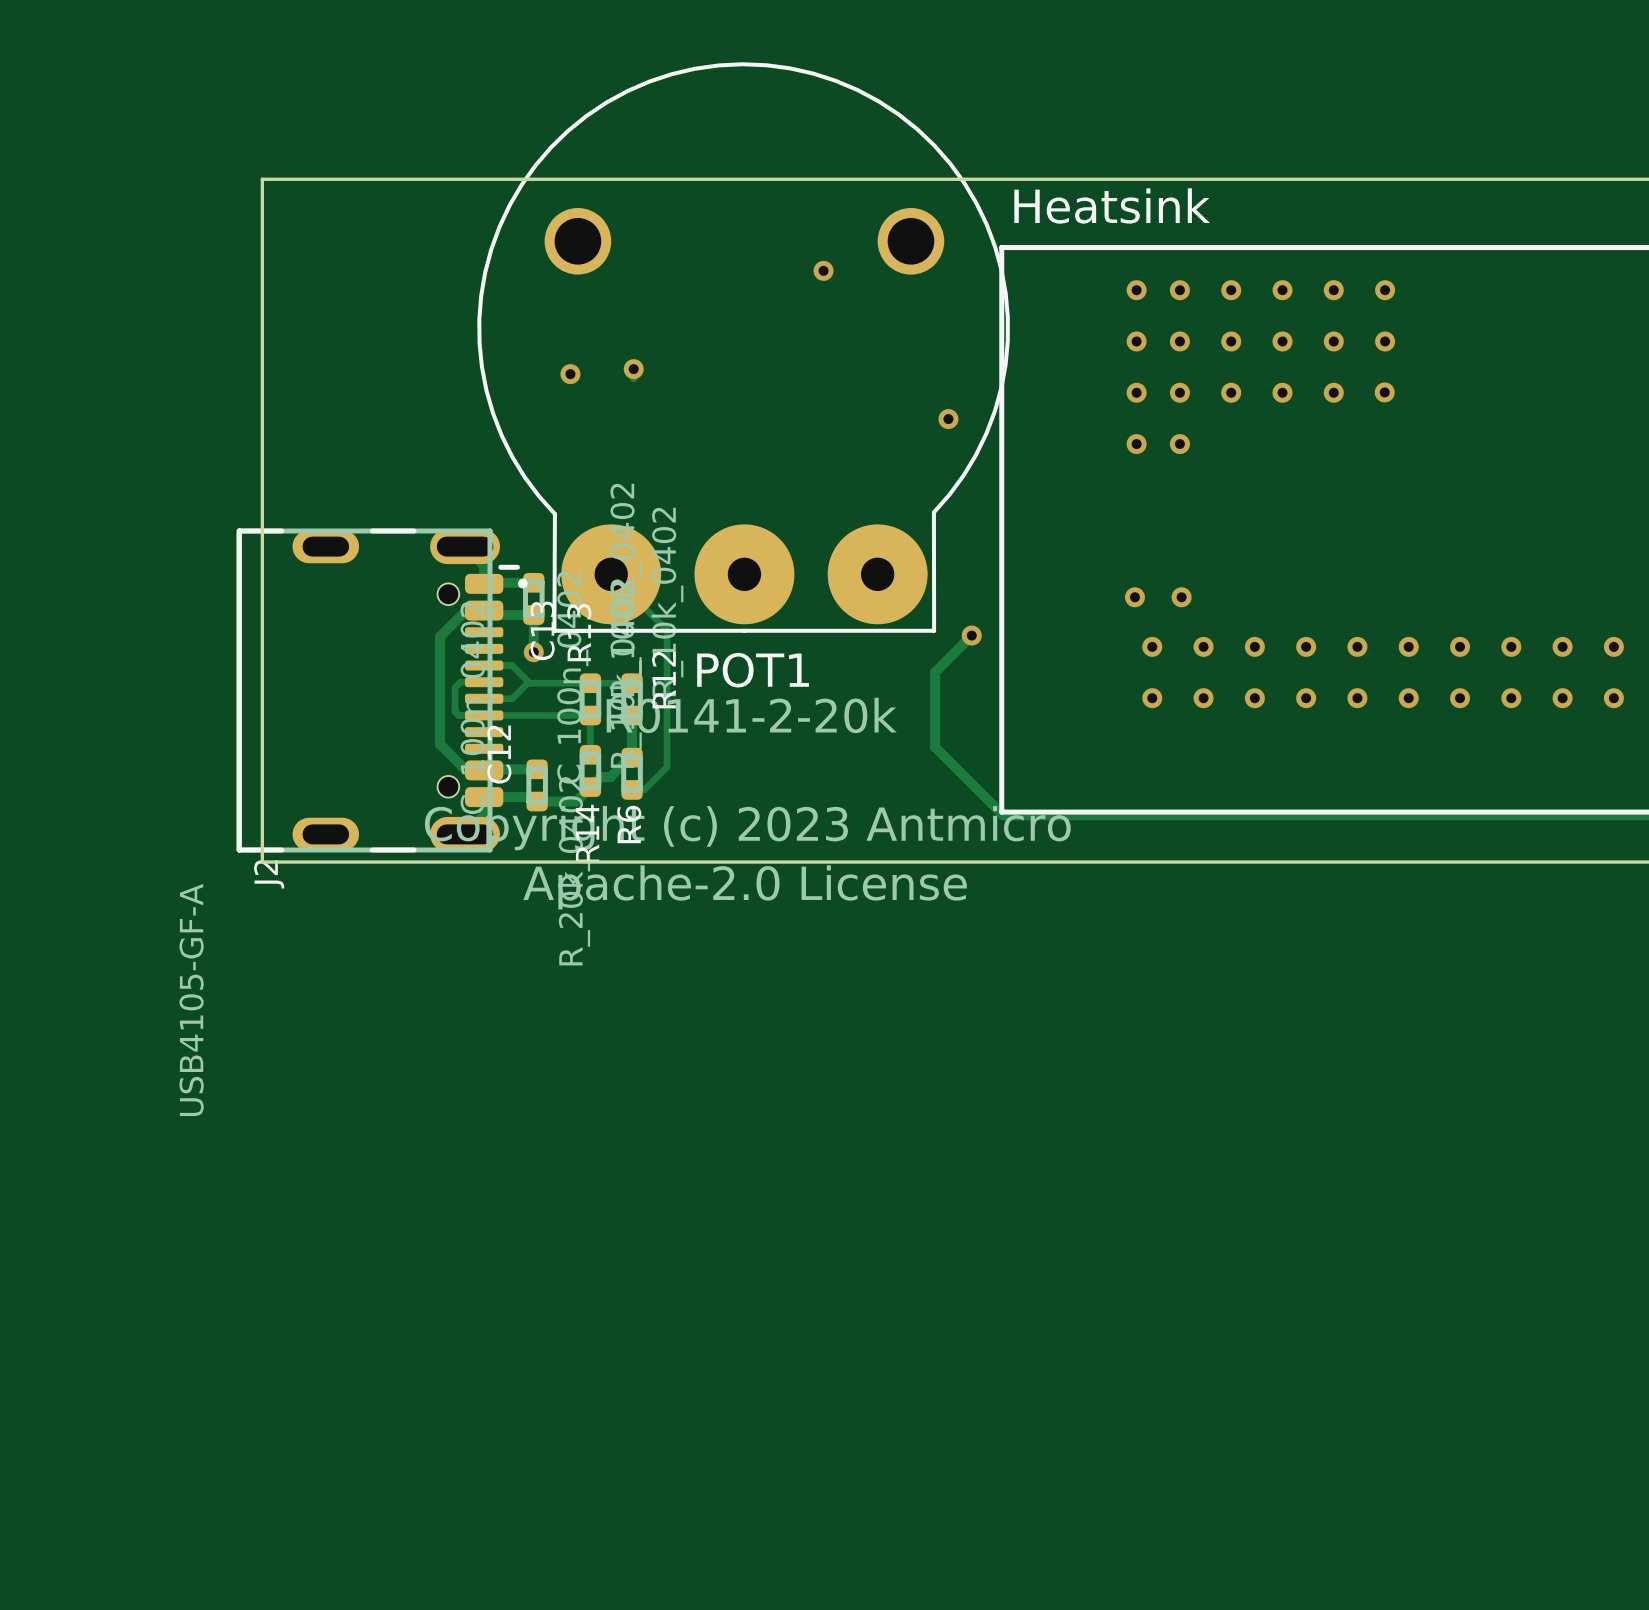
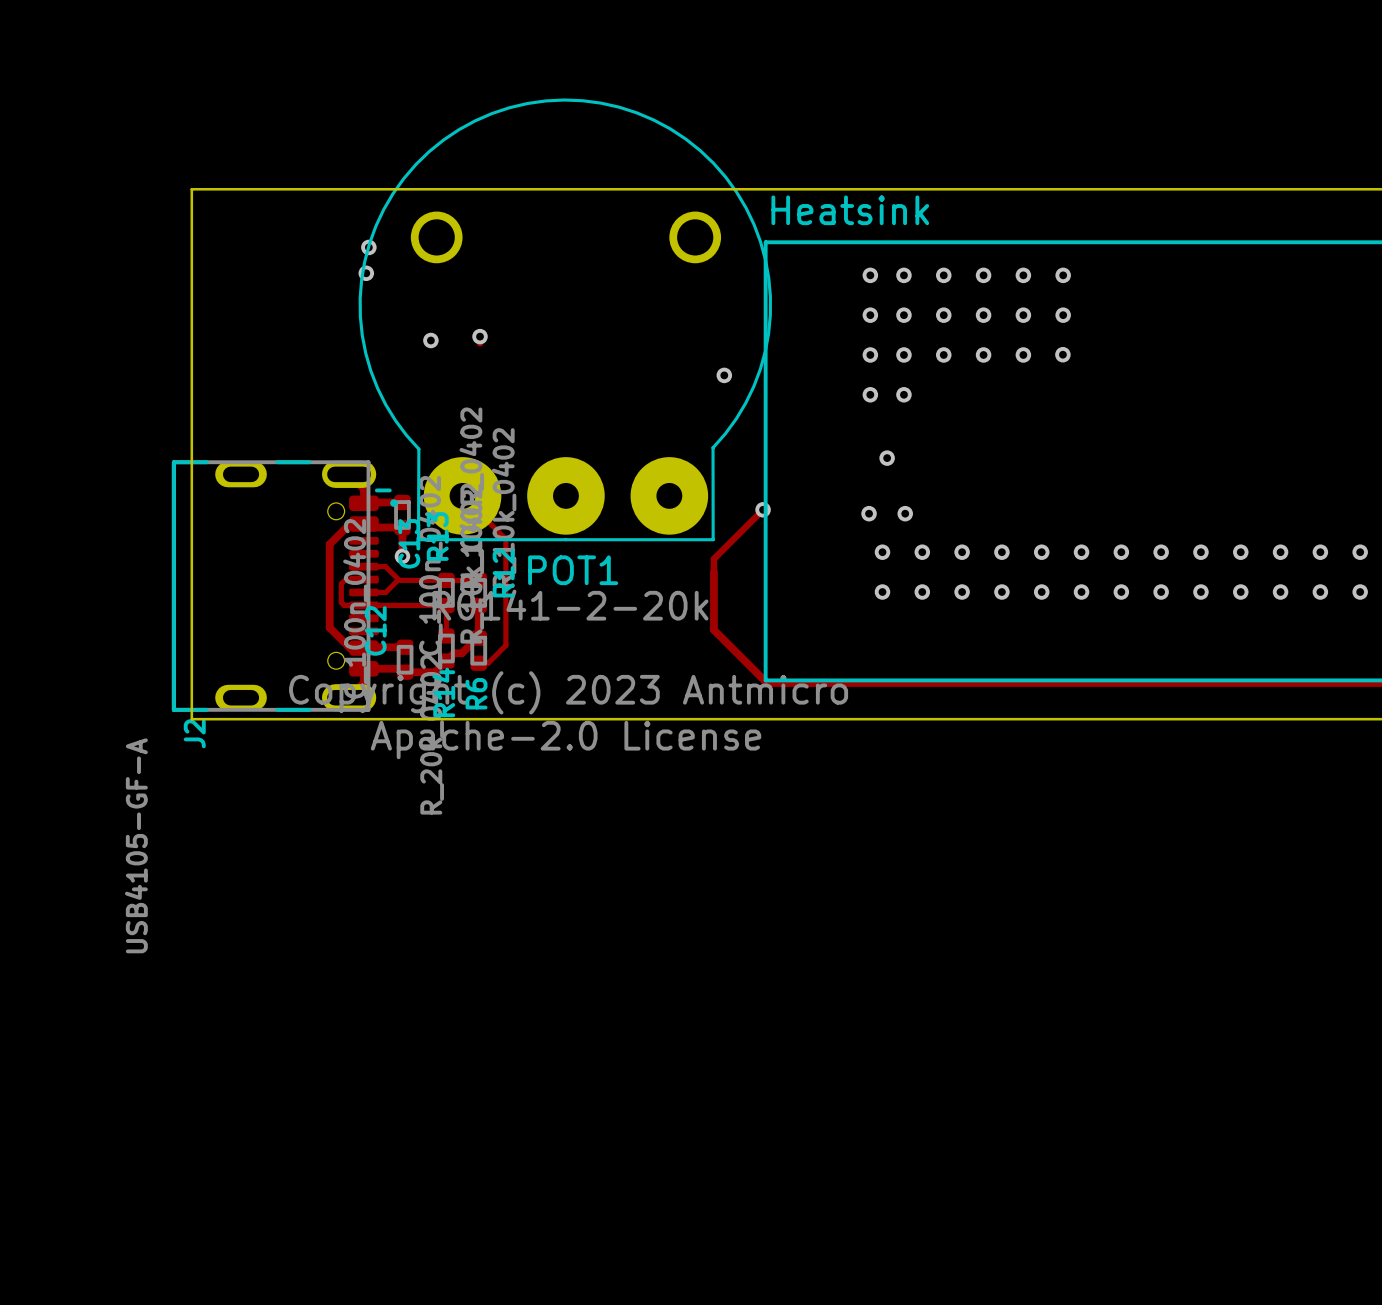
via: none -> (368, 247)
via: (823, 270) -> none
via: none -> (366, 273)
via: none -> (887, 458)
track: (971, 635) (935, 672) -> (763, 509) (713, 558) (713, 571)
via position: (971, 635) -> (763, 509)

